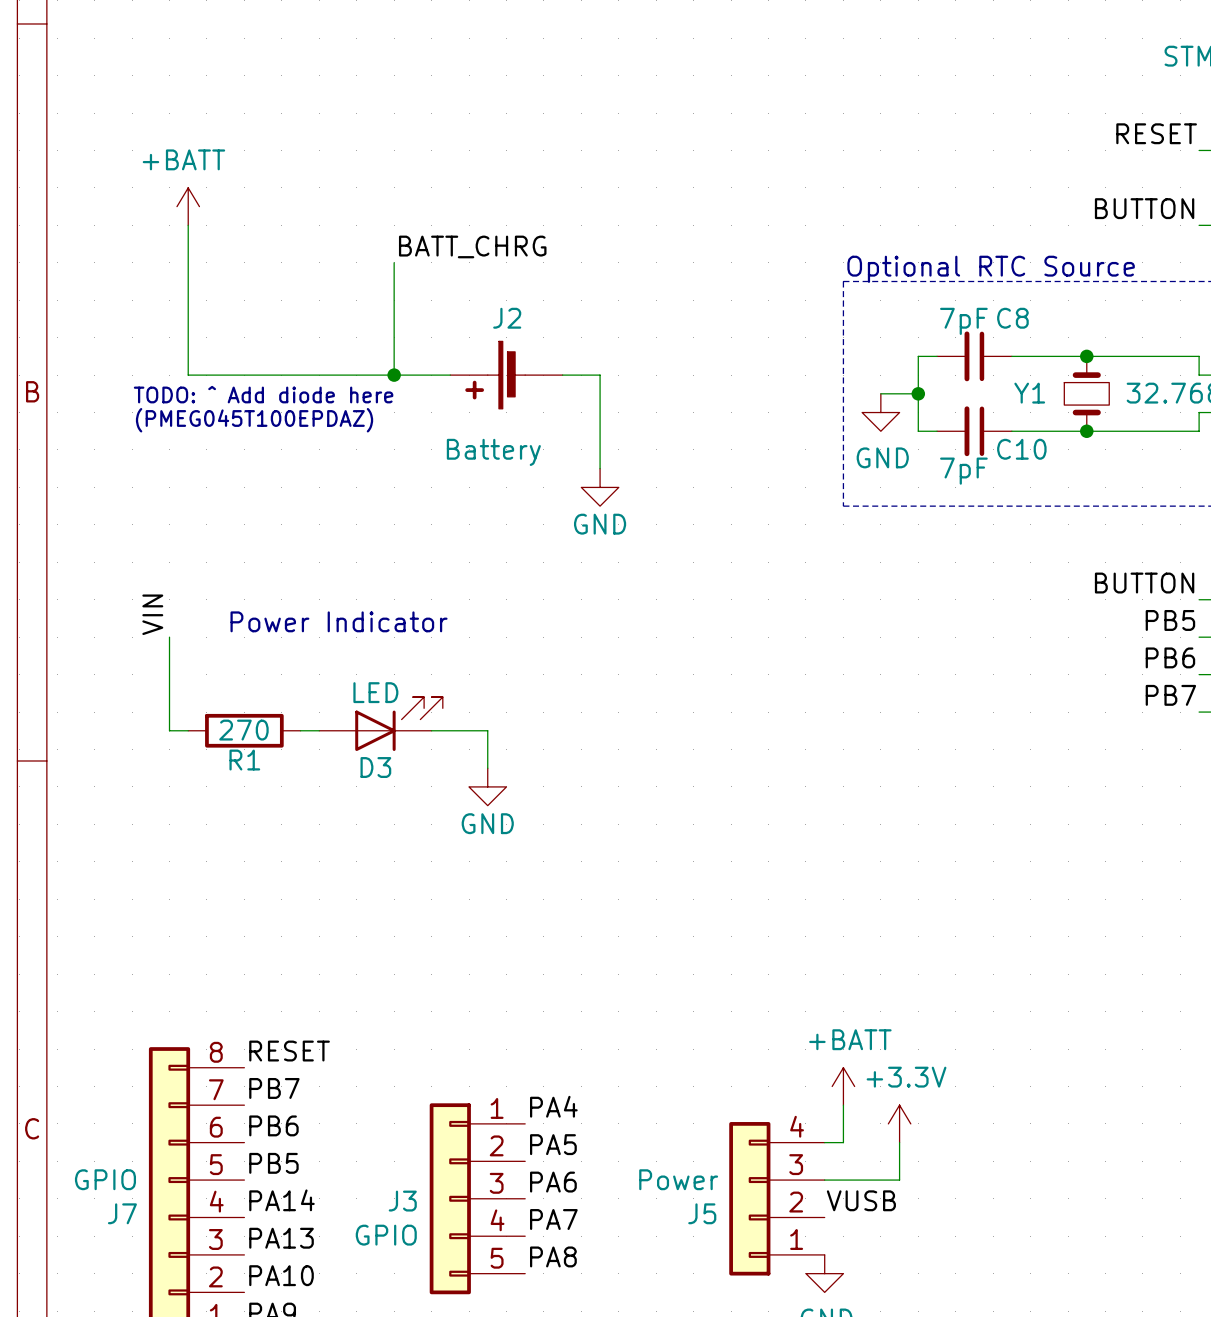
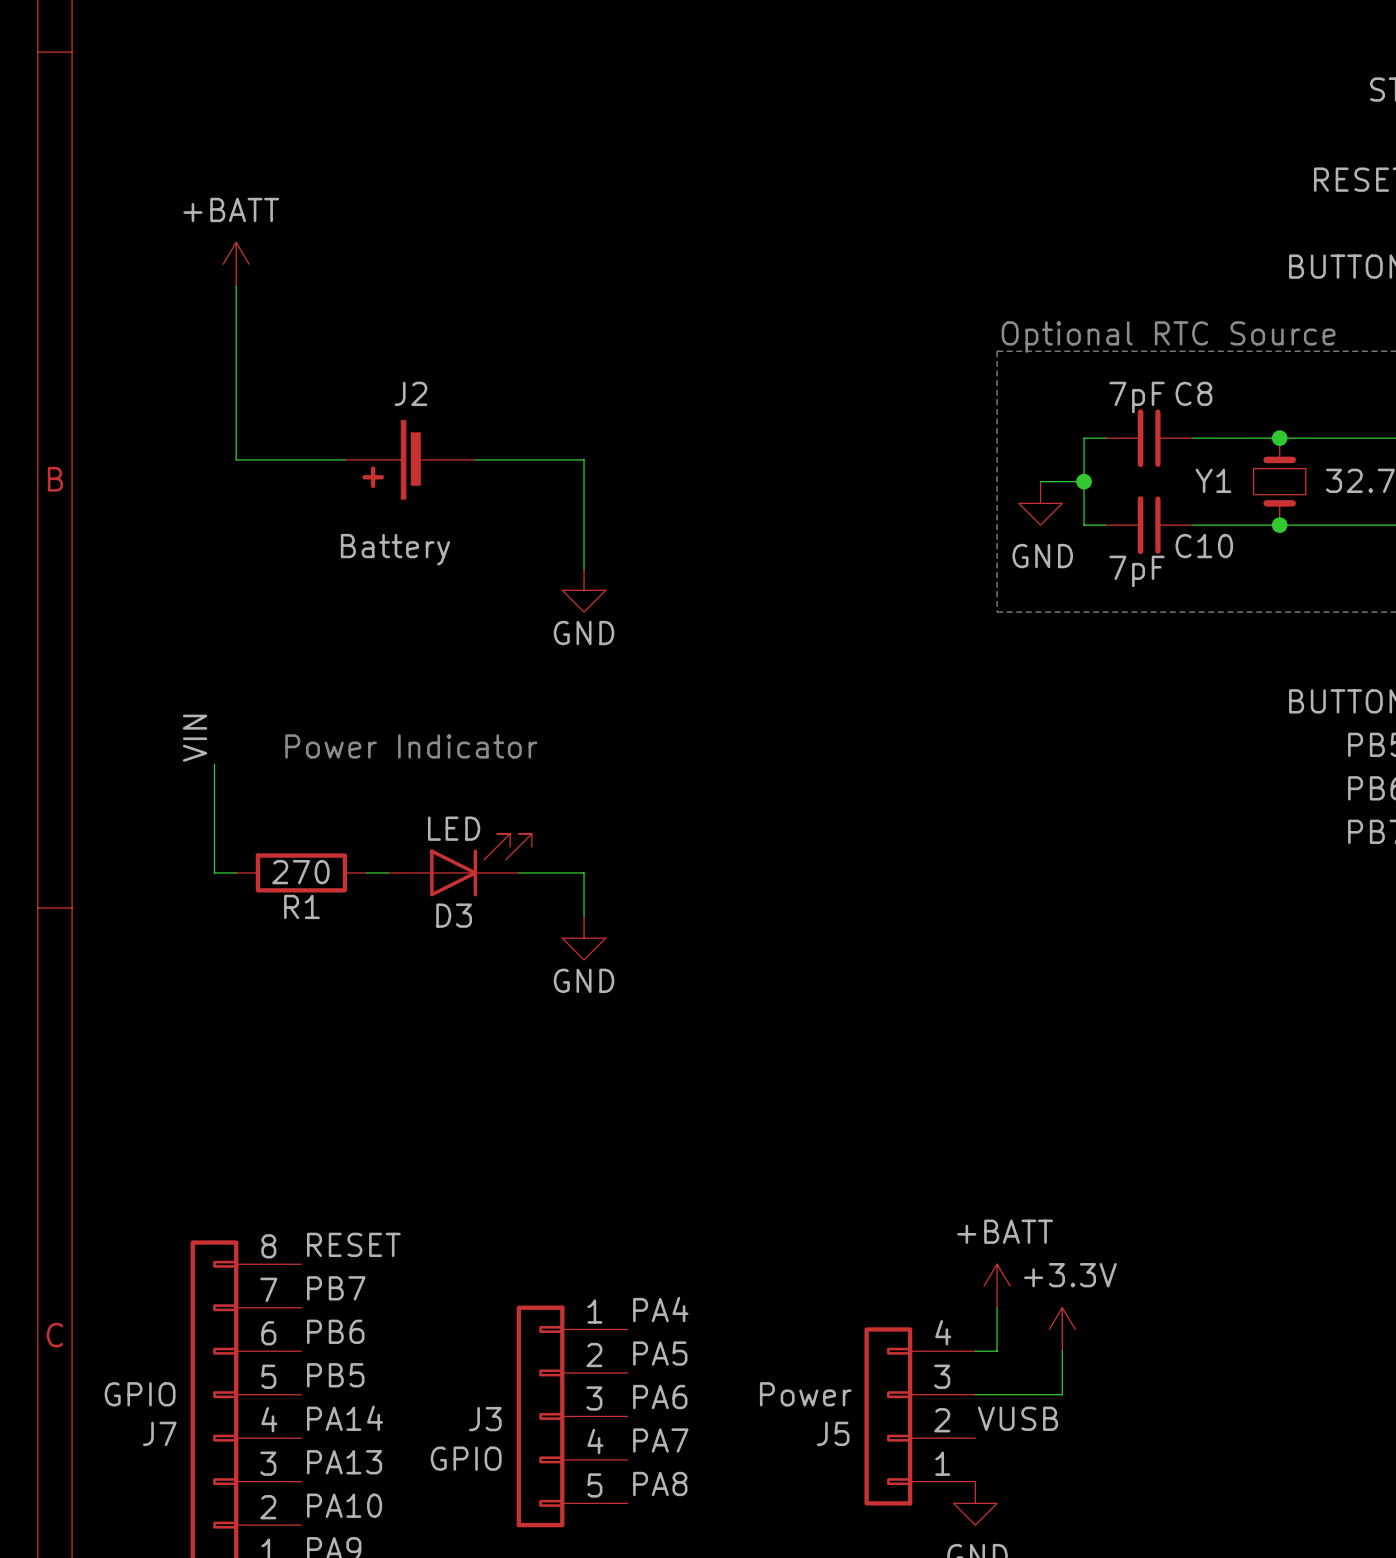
label: BATT_CHRG (472, 246) -> none
wire: (394, 262) (394, 375) (281, 375) -> none
junction: (394, 375) -> none
J2 position: (506, 375) -> (410, 459)
wire: (562, 375) (600, 375) (600, 468) -> (540, 459) (584, 459) (584, 568)
text: TODO: ^ Add diode here (263, 394) -> none
text: (PMEG045T100EPDAZ) (254, 420) -> none
power symbol position: GND (600, 487) -> GND (584, 590)

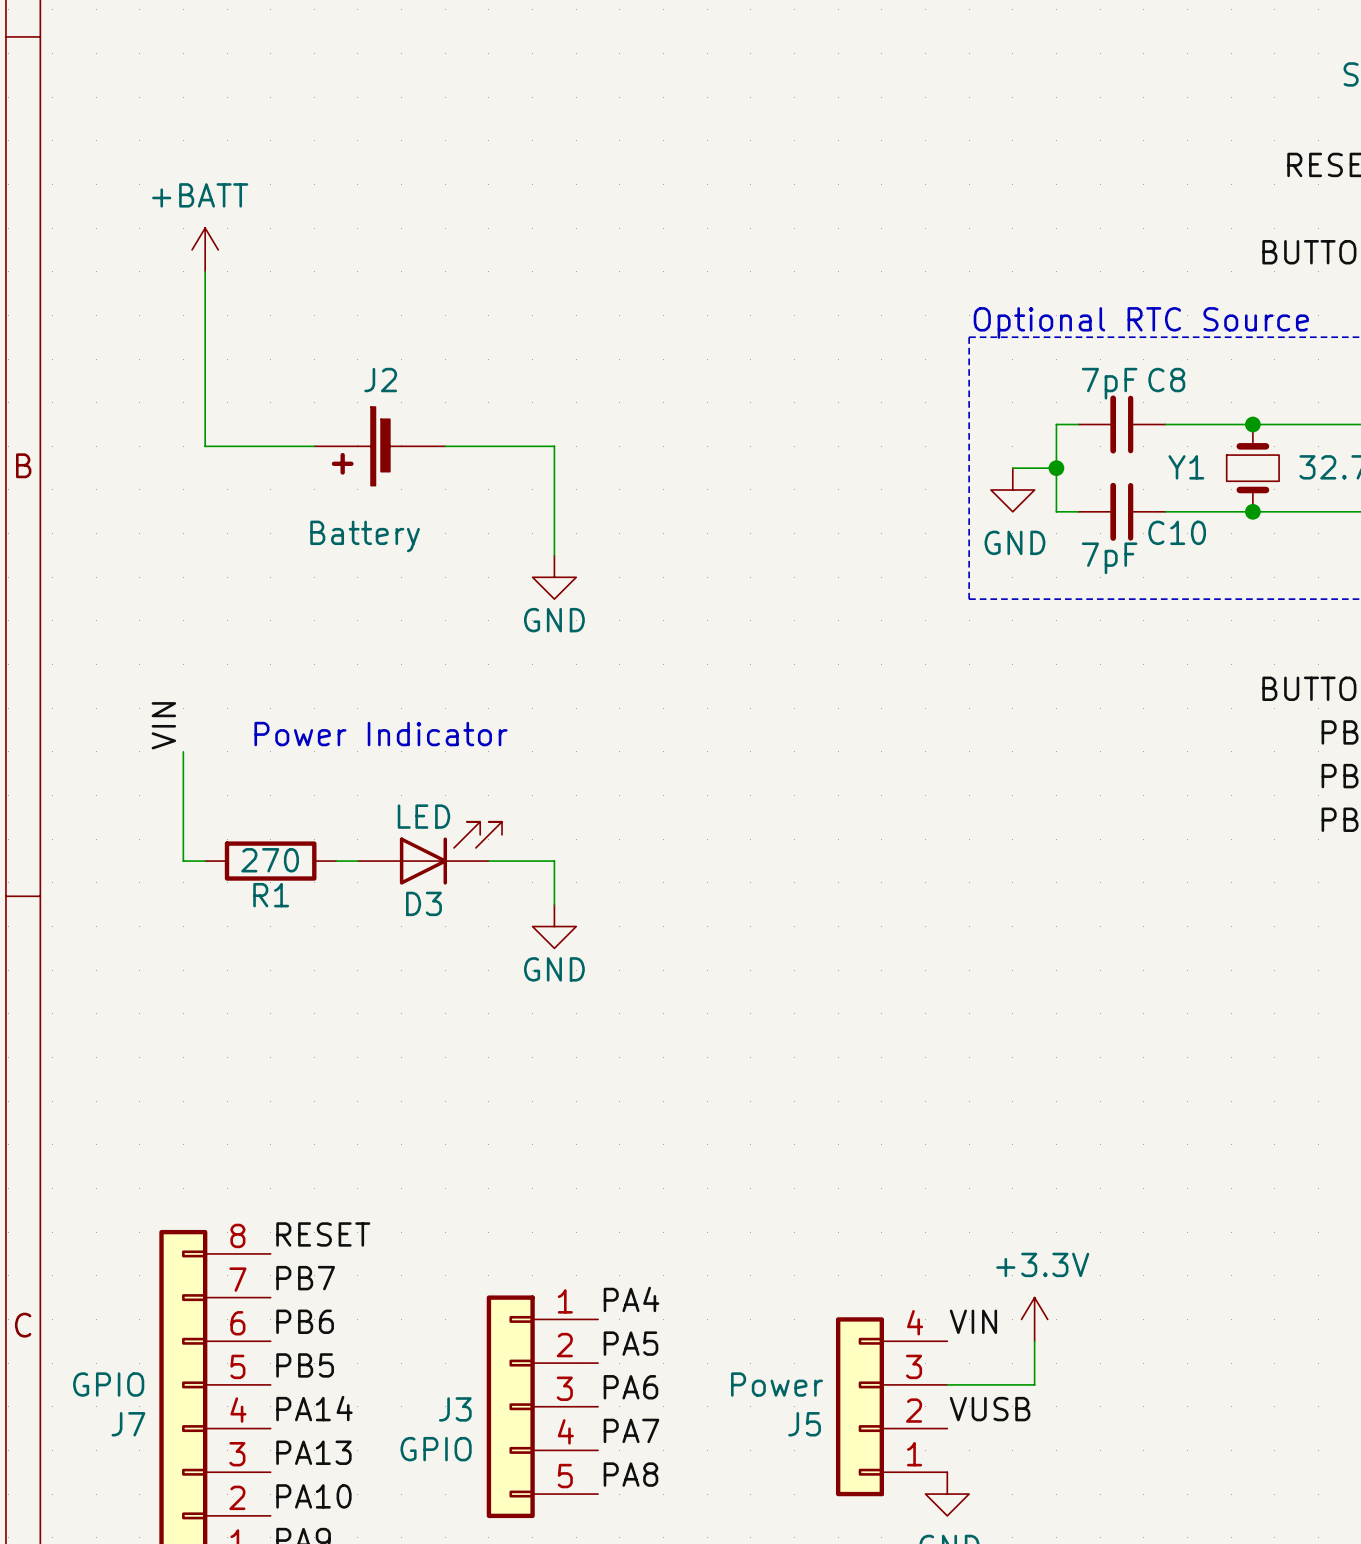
power symbol: +BATT (997, 1285) -> none
wire: (997, 1307) (997, 1351) (975, 1351) -> none
label: none -> VIN (973, 1321)

